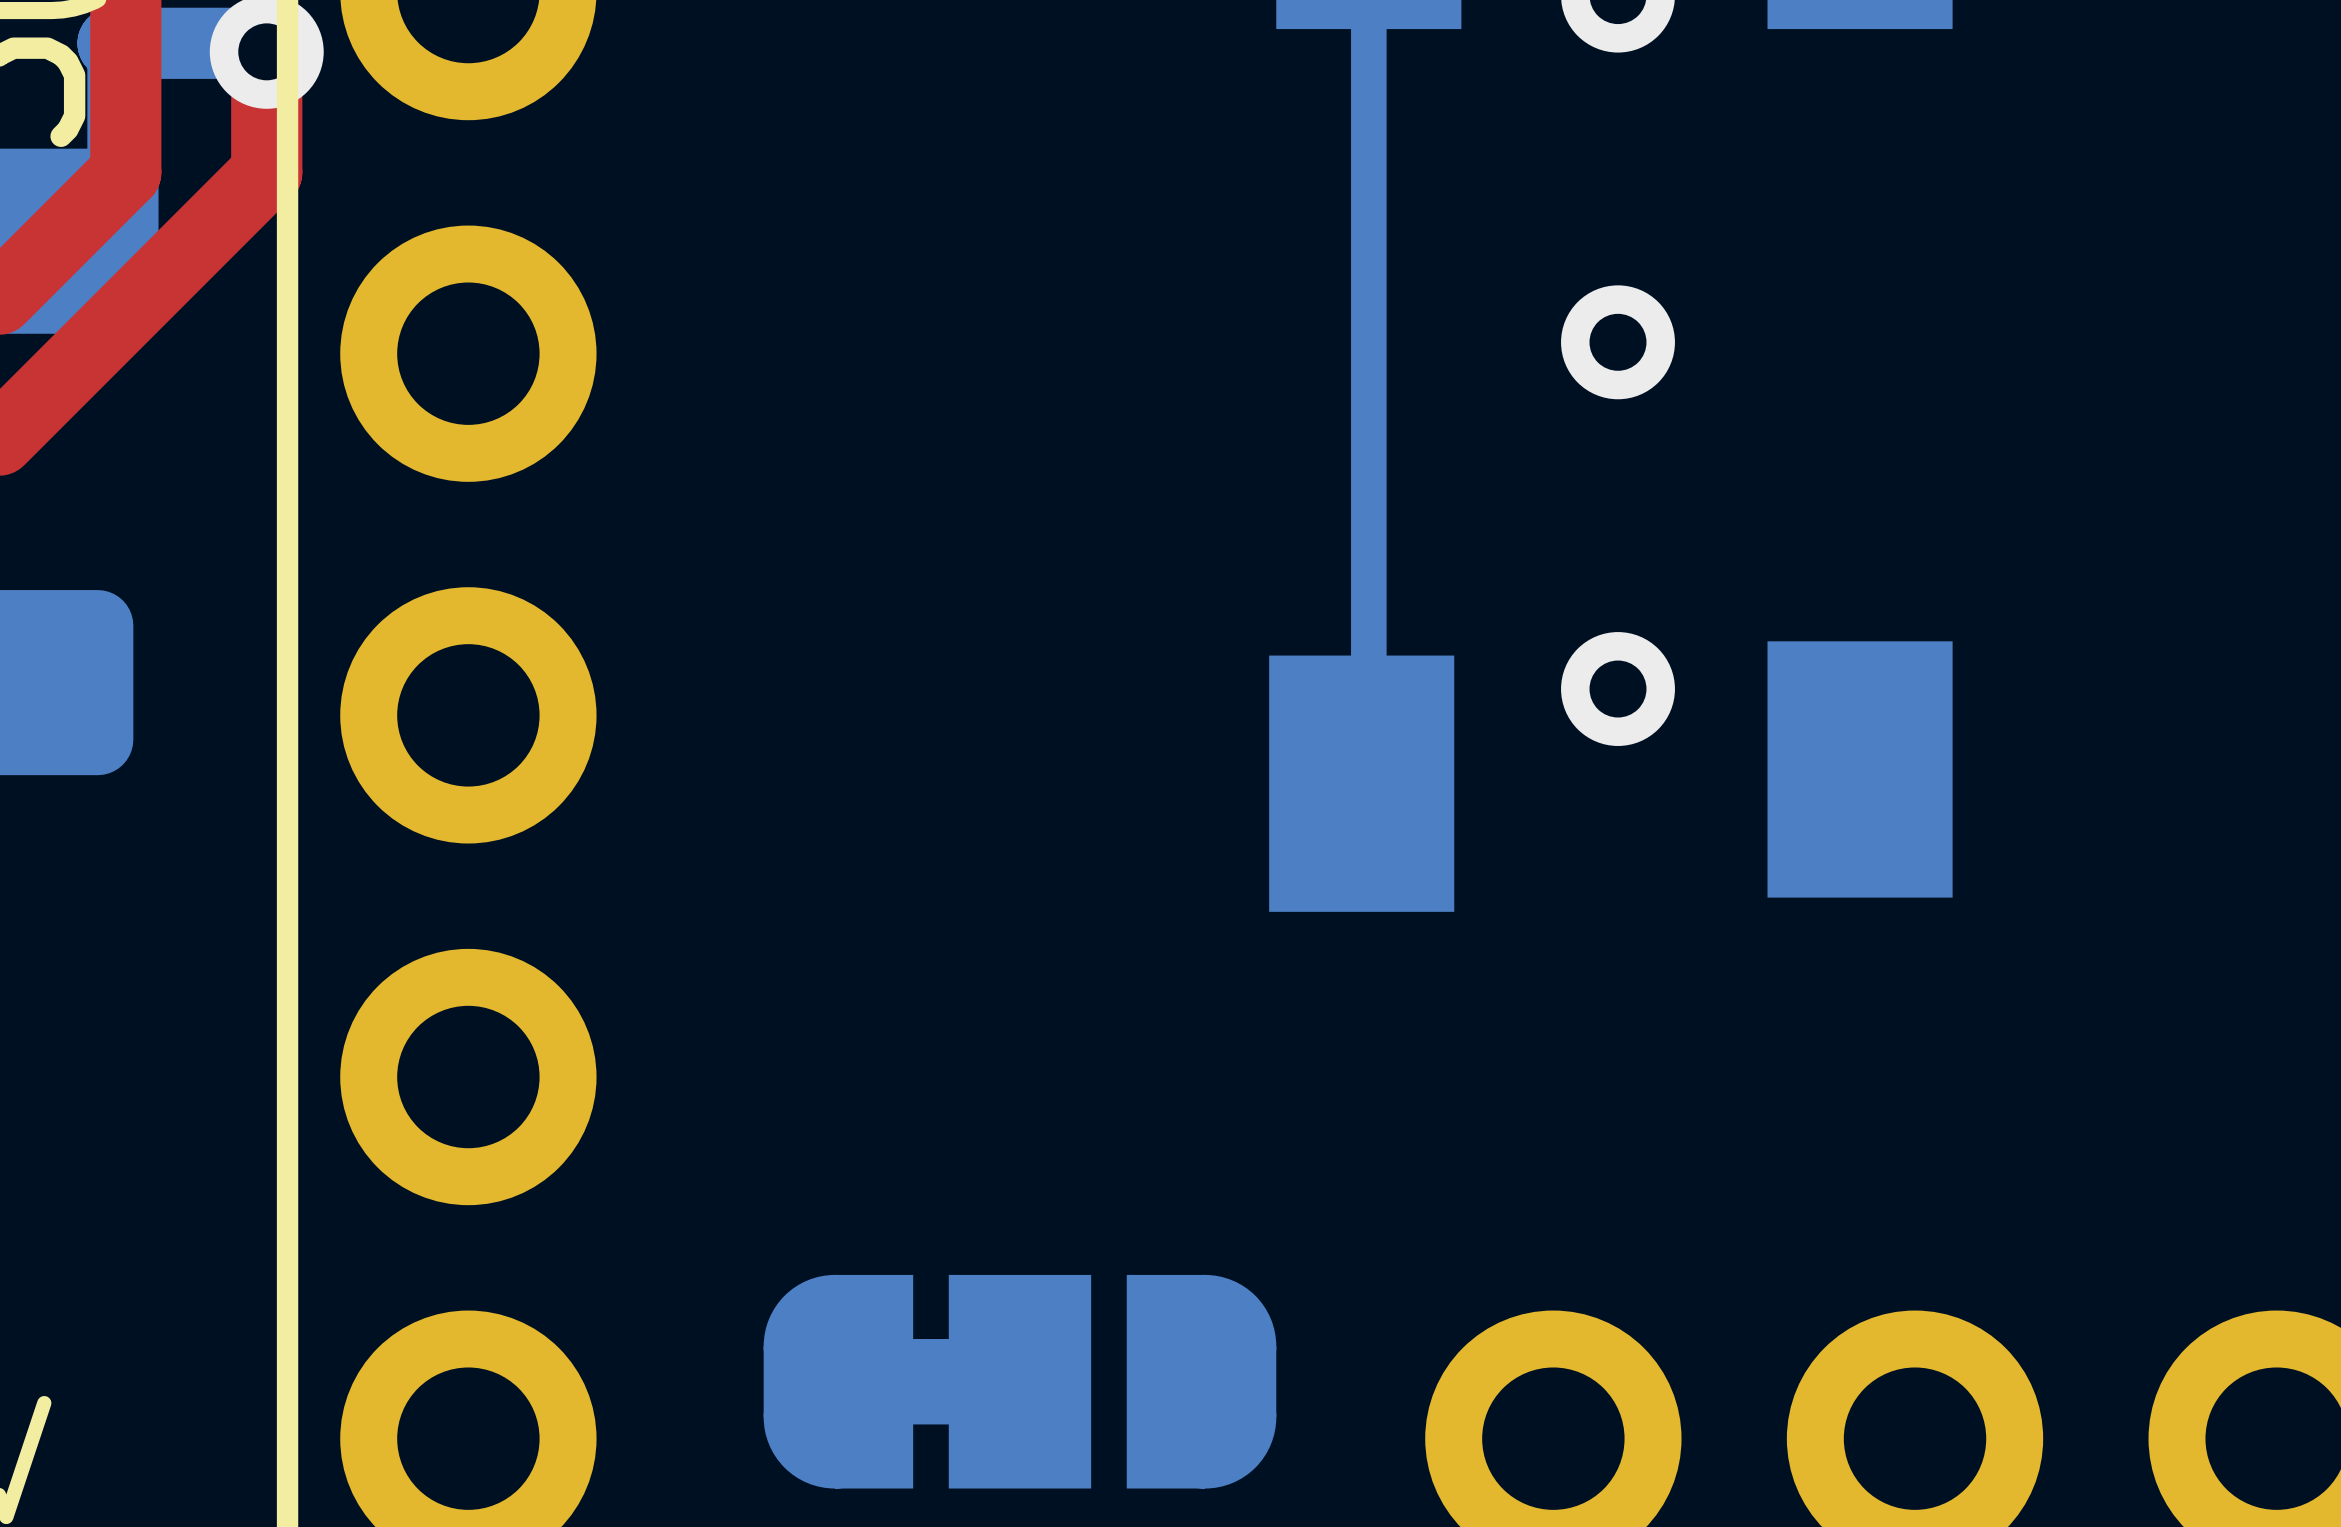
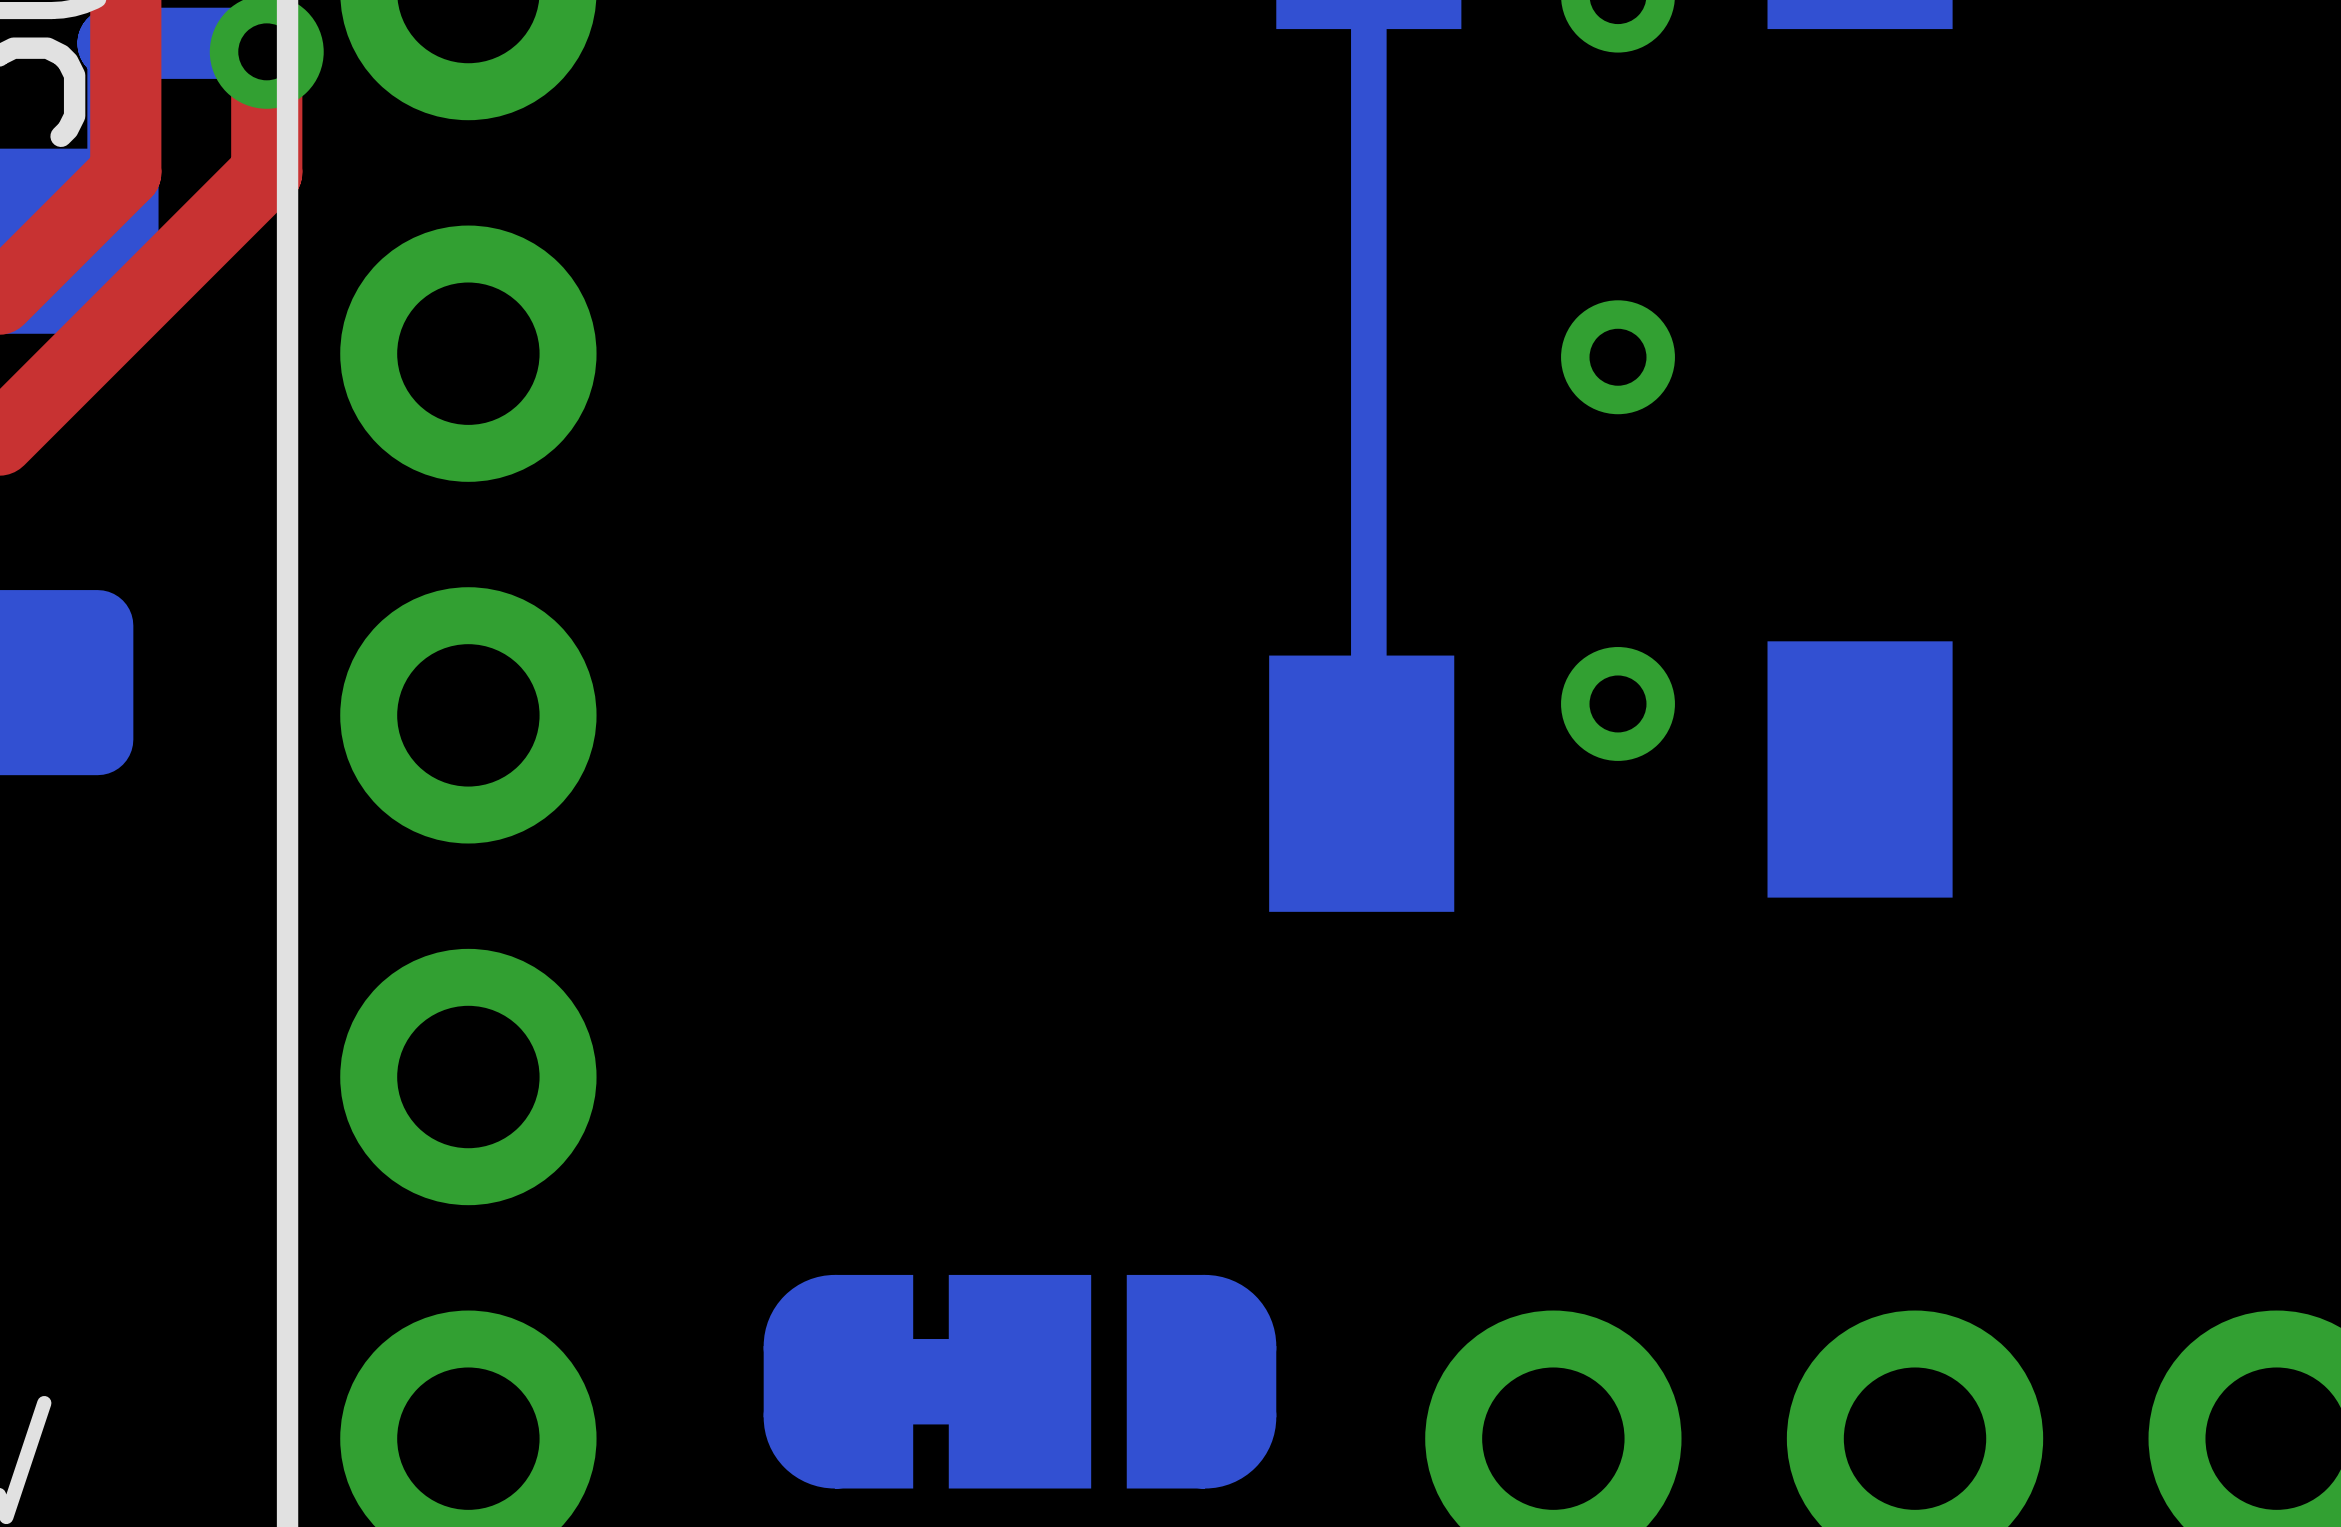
via position: (1618, 342) -> (1618, 357)
via position: (1618, 689) -> (1618, 703)

